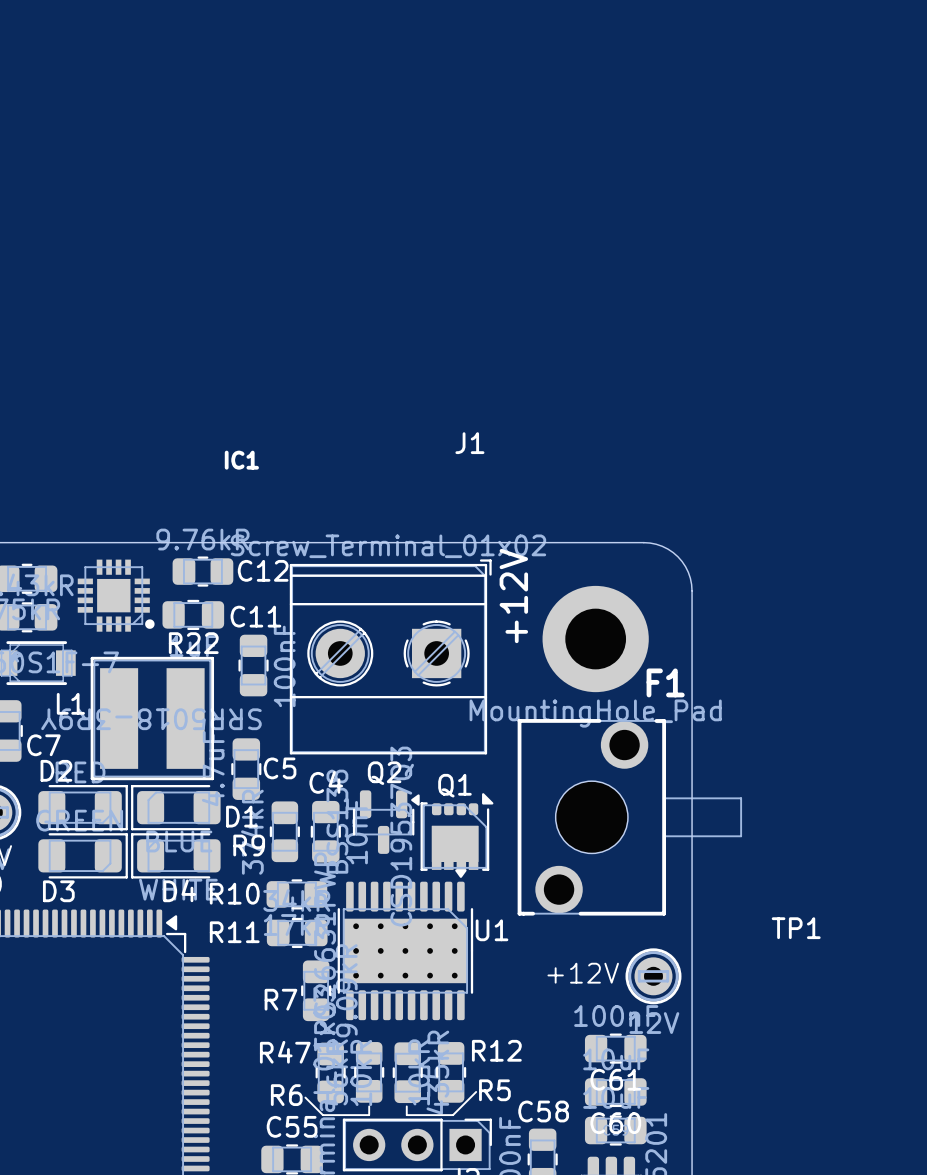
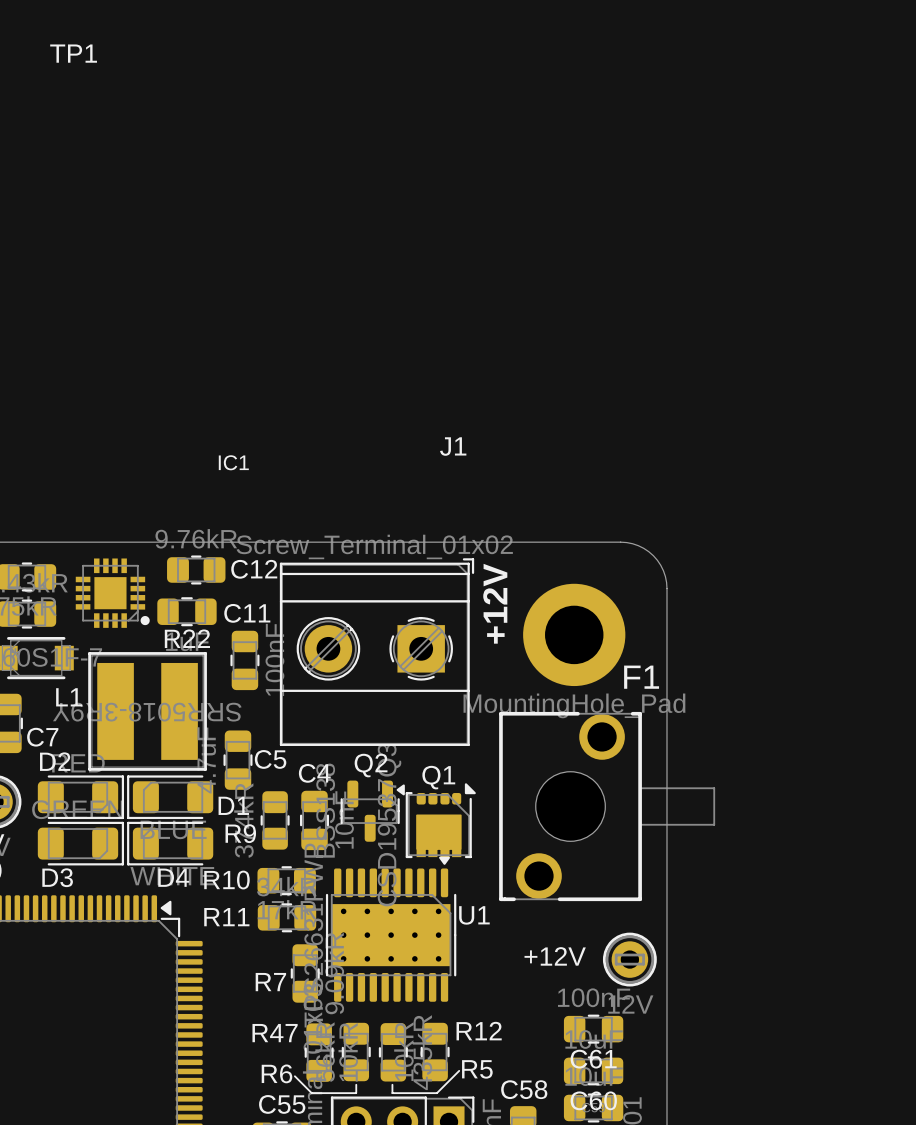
TP1 name position: TP1 (796, 928) -> TP1 (73, 53)

